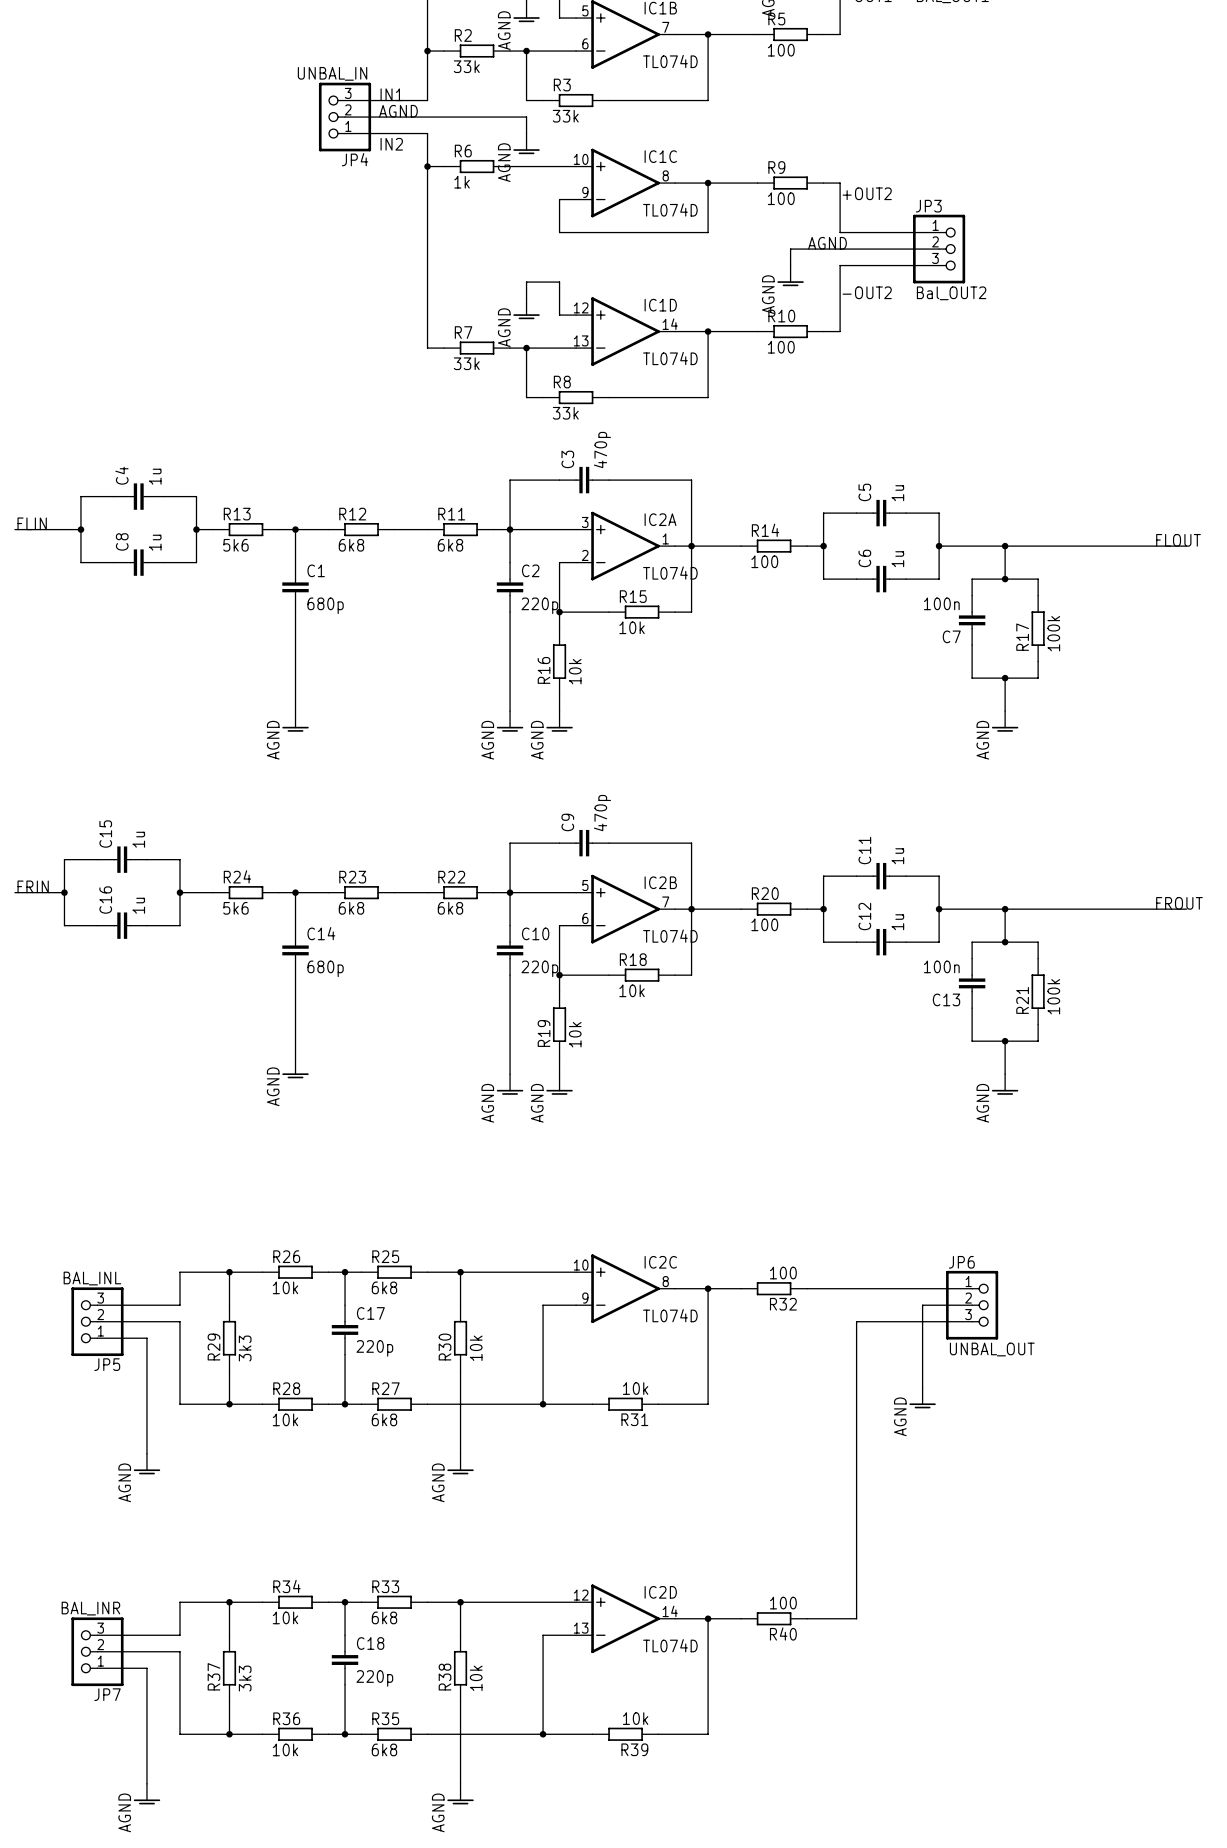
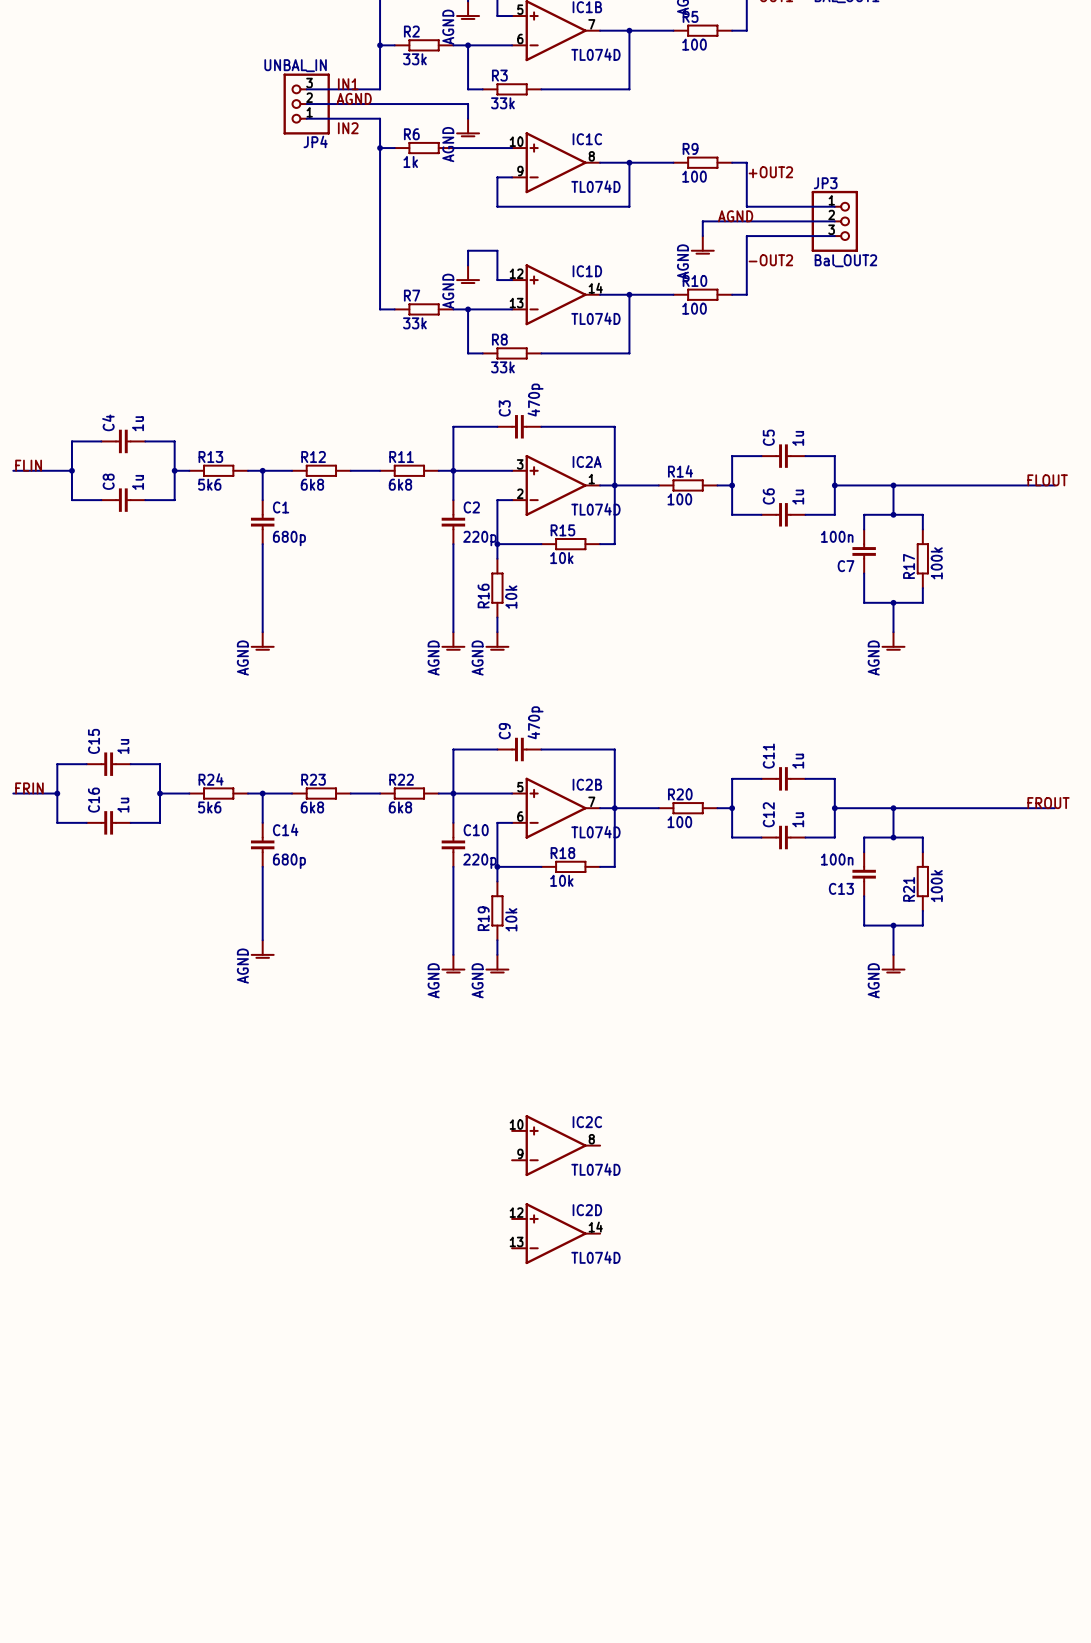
wire: (229, 1272) (229, 1305) -> none
junction: (229, 1272) -> none
wire: (262, 1272) (179, 1272) (179, 1305) (97, 1305) -> none
R26: 10k (295, 1272) -> none
wire: (328, 1272) (361, 1272) -> none
wire: (345, 1272) (345, 1305) -> none
junction: (345, 1272) -> none
R25: 6k8 (394, 1272) -> none
wire: (427, 1272) (576, 1272) -> none
wire: (460, 1272) (460, 1305) -> none
junction: (460, 1272) -> none
wire: (675, 1288) (741, 1288) -> none
wire: (708, 1288) (708, 1404) (658, 1404) -> none
junction: (708, 1288) -> none
R32: 100 (774, 1288) -> none
wire: (807, 1288) (972, 1288) -> none
wire: (576, 1305) (543, 1305) (543, 1404) -> none
wire: (972, 1305) (922, 1305) (922, 1387) -> none
JP6: UNBAL_OUT (972, 1305) -> none
wire: (97, 1321) (179, 1321) (179, 1404) (262, 1404) -> none
JP5: BAL_INL (97, 1321) -> none
wire: (972, 1321) (856, 1321) (856, 1618) (807, 1618) -> none
C17: 220p (345, 1329) -> none
wire: (97, 1338) (146, 1338) (146, 1453) -> none
R29: 3k3 (229, 1338) -> none
R30: 10k (460, 1338) -> none
wire: (345, 1354) (345, 1404) -> none
wire: (229, 1371) (229, 1404) -> none
wire: (460, 1371) (460, 1453) -> none
power symbol: AGND (922, 1398) -> none
junction: (229, 1404) -> none
R28: 10k (295, 1404) -> none
wire: (328, 1404) (361, 1404) -> none
junction: (345, 1404) -> none
R27: 6k8 (394, 1404) -> none
wire: (427, 1404) (592, 1404) -> none
junction: (543, 1404) -> none
R31: 10k (625, 1404) -> none
power symbol: AGND (146, 1464) -> none
power symbol: AGND (460, 1464) -> none
wire: (229, 1602) (229, 1635) -> none
junction: (229, 1602) -> none
wire: (262, 1602) (179, 1602) (179, 1635) (97, 1635) -> none
R34: 10k (295, 1602) -> none
wire: (328, 1602) (361, 1602) -> none
wire: (345, 1602) (345, 1635) -> none
junction: (345, 1602) -> none
R33: 6k8 (394, 1602) -> none
wire: (427, 1602) (576, 1602) -> none
wire: (460, 1602) (460, 1635) -> none
junction: (460, 1602) -> none
IC2D position: (625, 1618) -> (556, 1233)
wire: (675, 1618) (741, 1618) -> none
wire: (708, 1618) (708, 1734) (658, 1734) -> none
junction: (708, 1618) -> none
R40: 100 (774, 1618) -> none
wire: (576, 1635) (543, 1635) (543, 1734) -> none
wire: (97, 1651) (179, 1651) (179, 1734) (262, 1734) -> none
JP7: BAL_INR (97, 1651) -> none
C18: 220p (345, 1660) -> none
wire: (97, 1668) (146, 1668) (146, 1783) -> none
R37: 3k3 (229, 1668) -> none
R38: 10k (460, 1668) -> none
wire: (345, 1684) (345, 1734) -> none
wire: (229, 1701) (229, 1734) -> none
wire: (460, 1701) (460, 1783) -> none
junction: (229, 1734) -> none
R36: 10k (295, 1734) -> none
wire: (328, 1734) (361, 1734) -> none
junction: (345, 1734) -> none
R35: 6k8 (394, 1734) -> none
wire: (427, 1734) (592, 1734) -> none
junction: (543, 1734) -> none
R39: 10k (625, 1734) -> none
power symbol: AGND (146, 1794) -> none
power symbol: AGND (460, 1794) -> none

